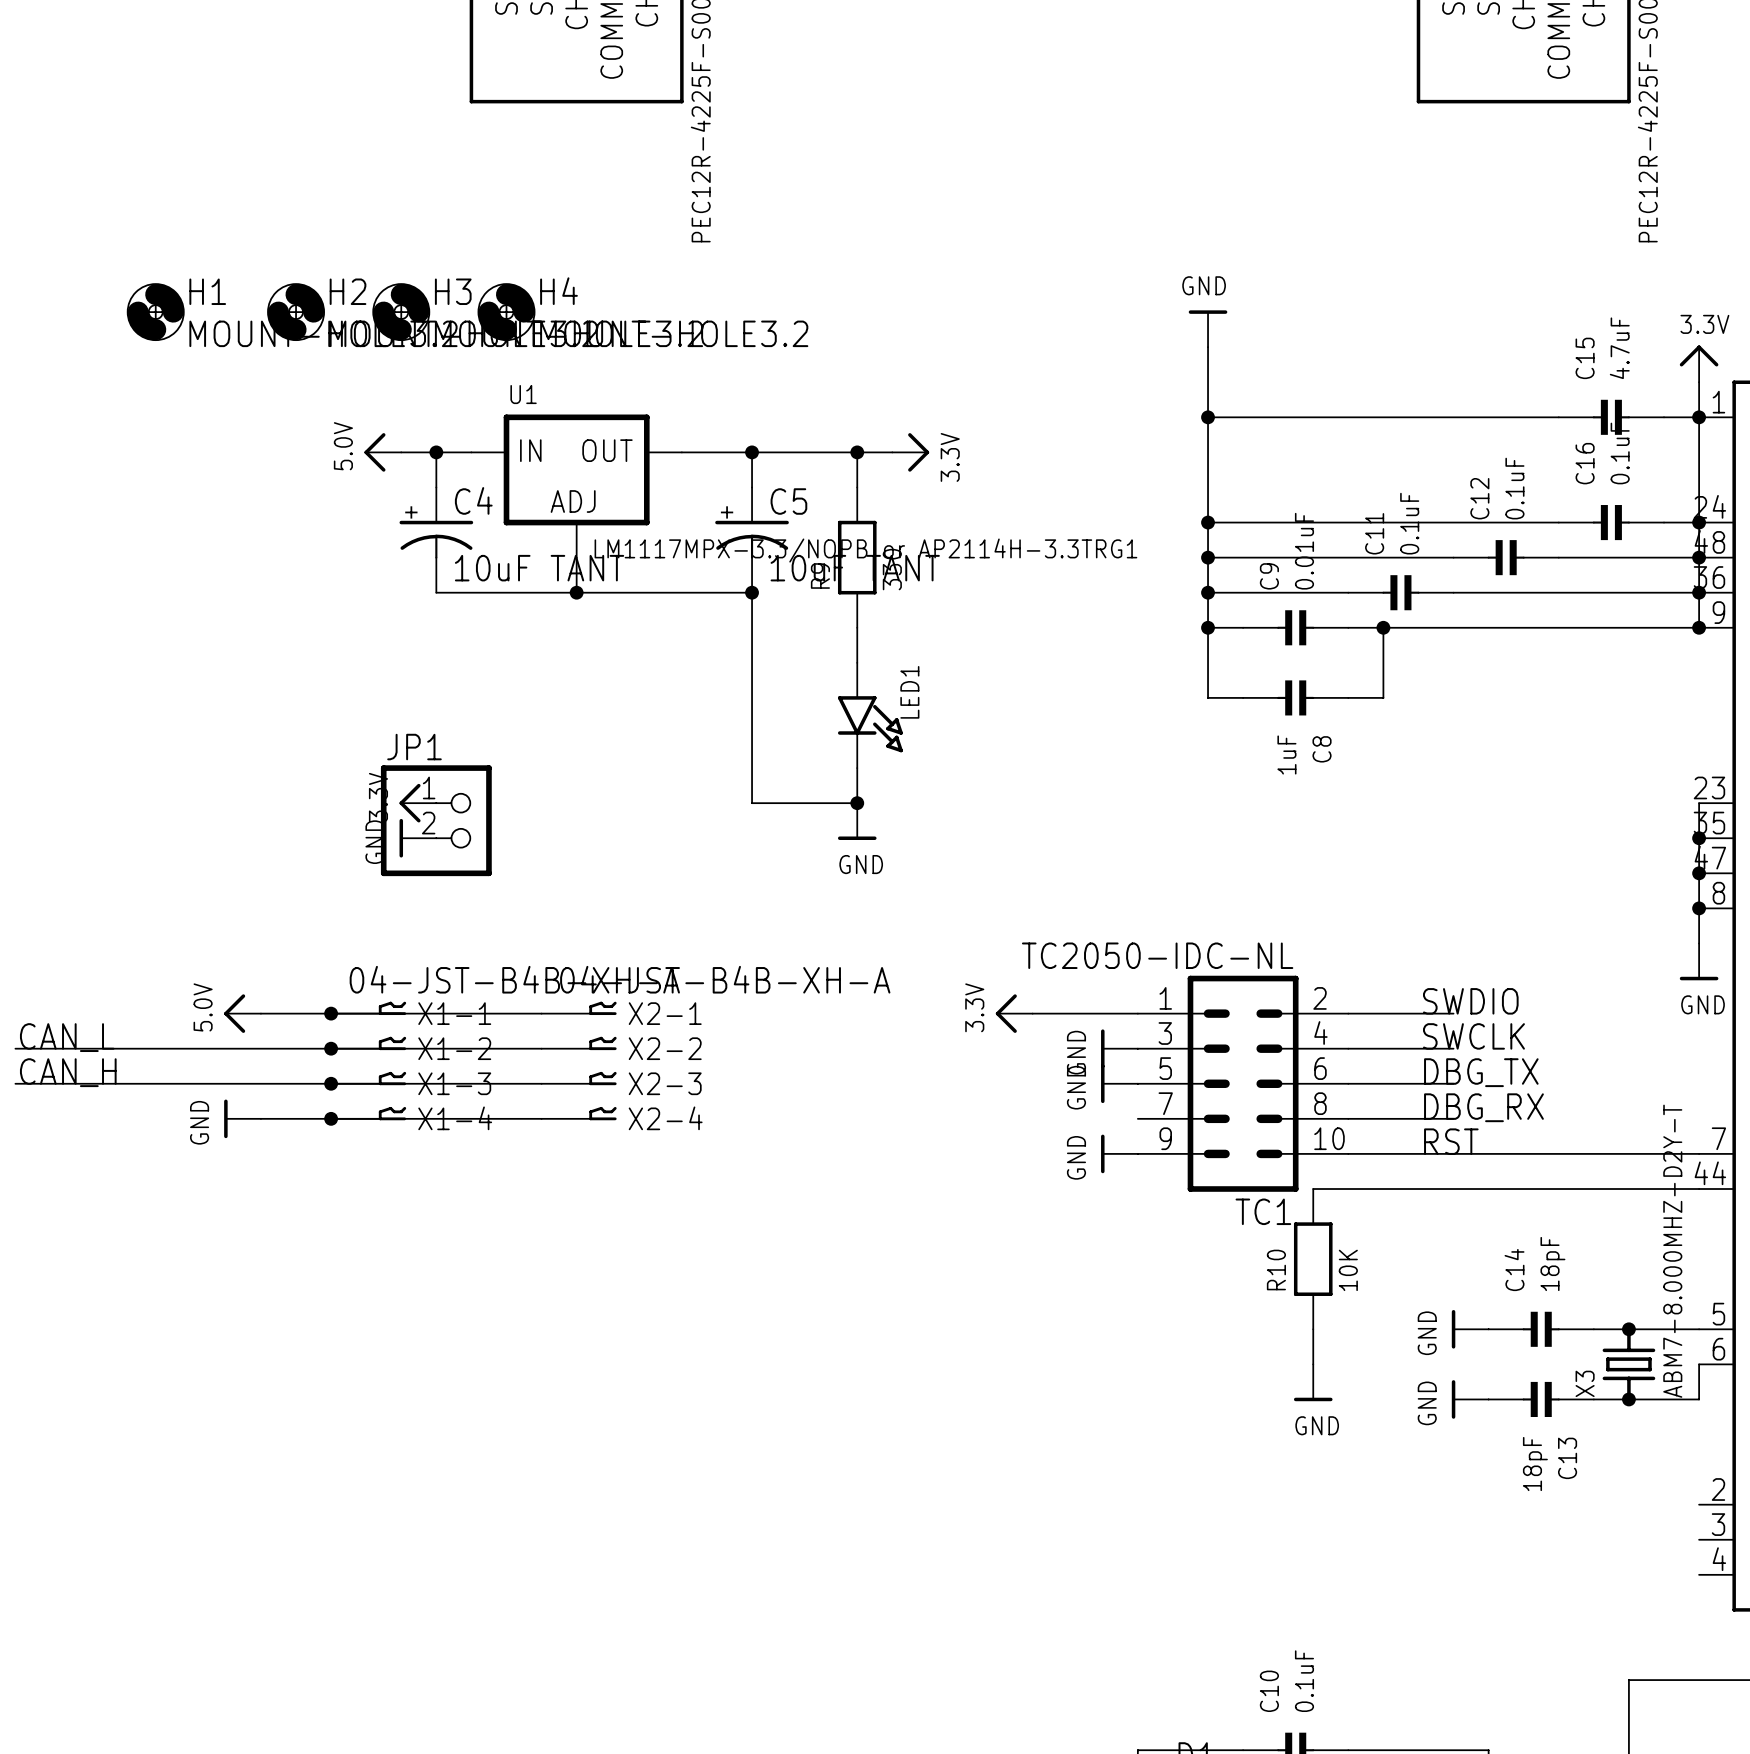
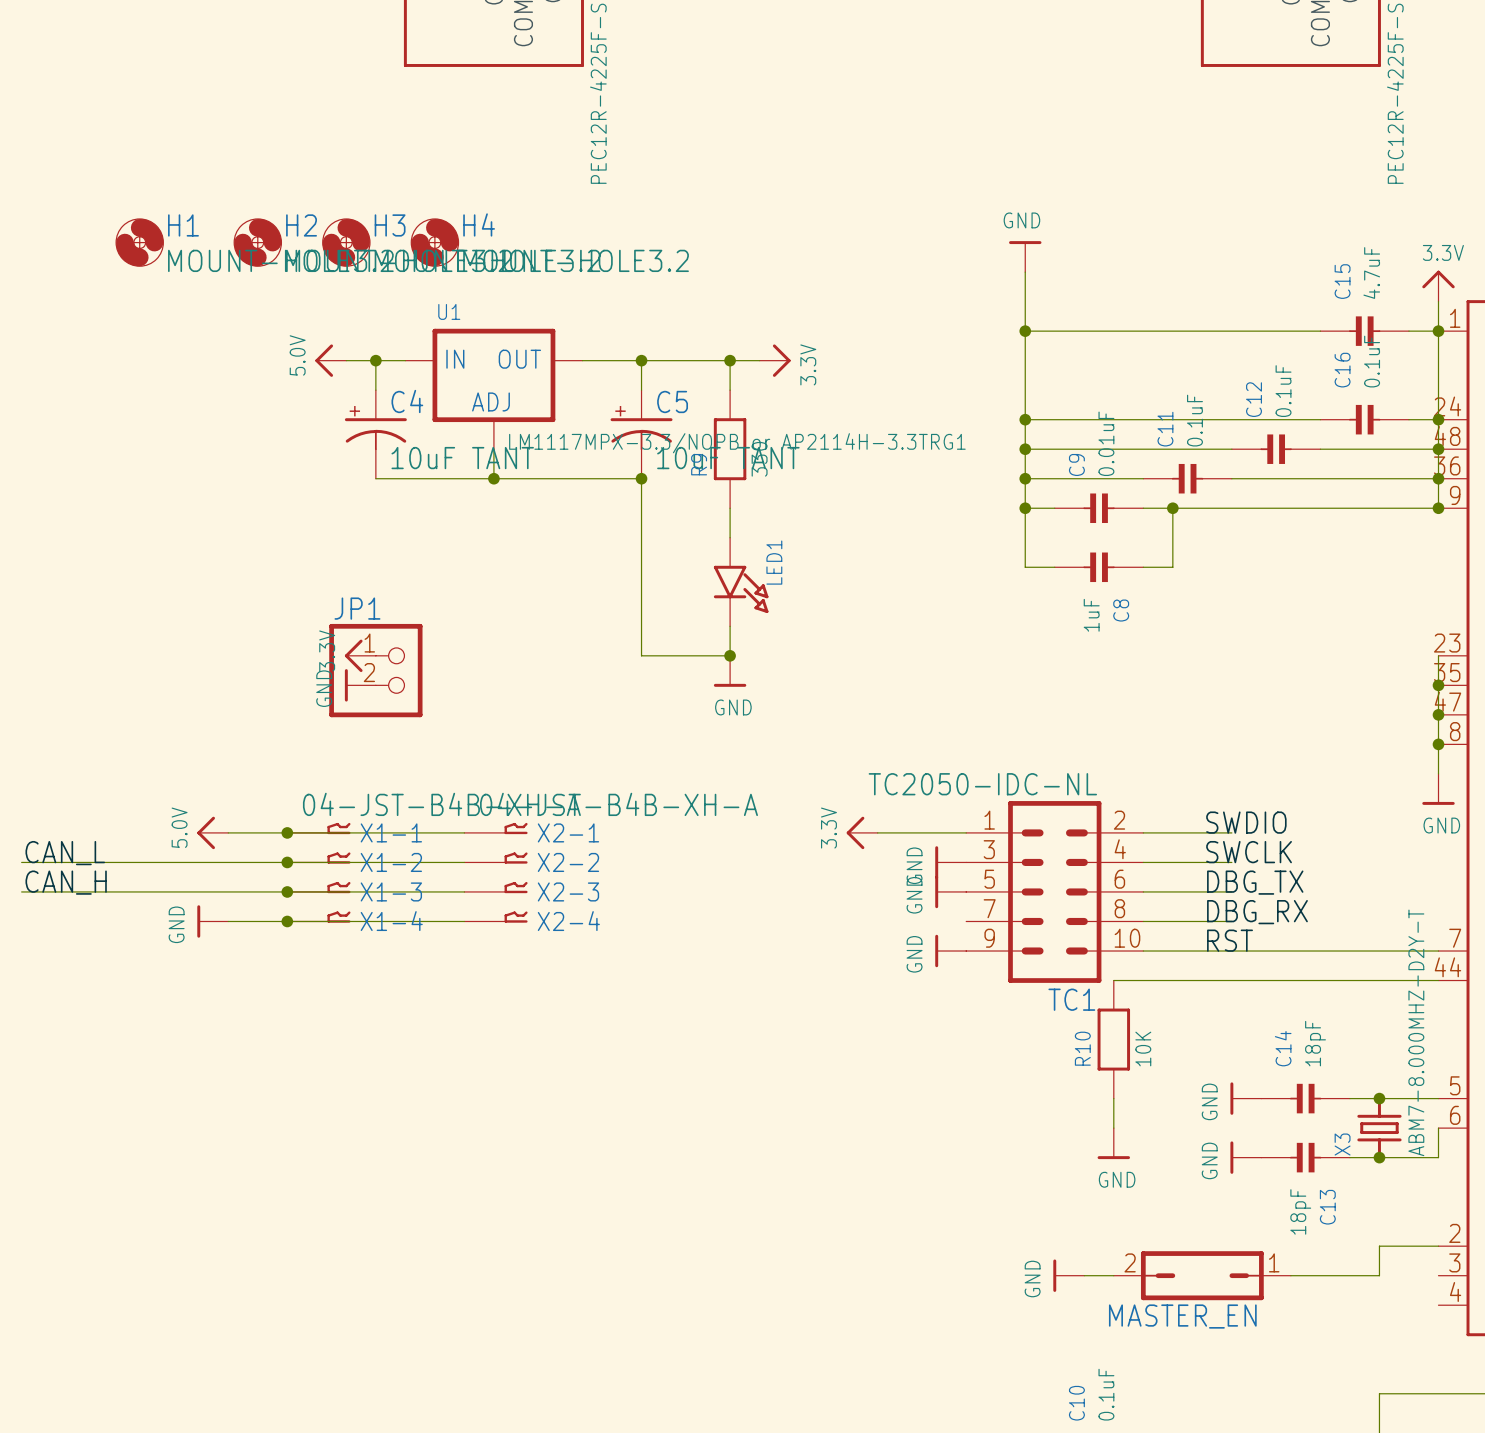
wire: none -> (1438, 1246) (1379, 1246) (1379, 1275) (1290, 1275)
power symbol: none -> GND (1068, 1275)
wire: none -> (1084, 1275) (1113, 1275)
MASTER_EN: none -> (1202, 1275)

